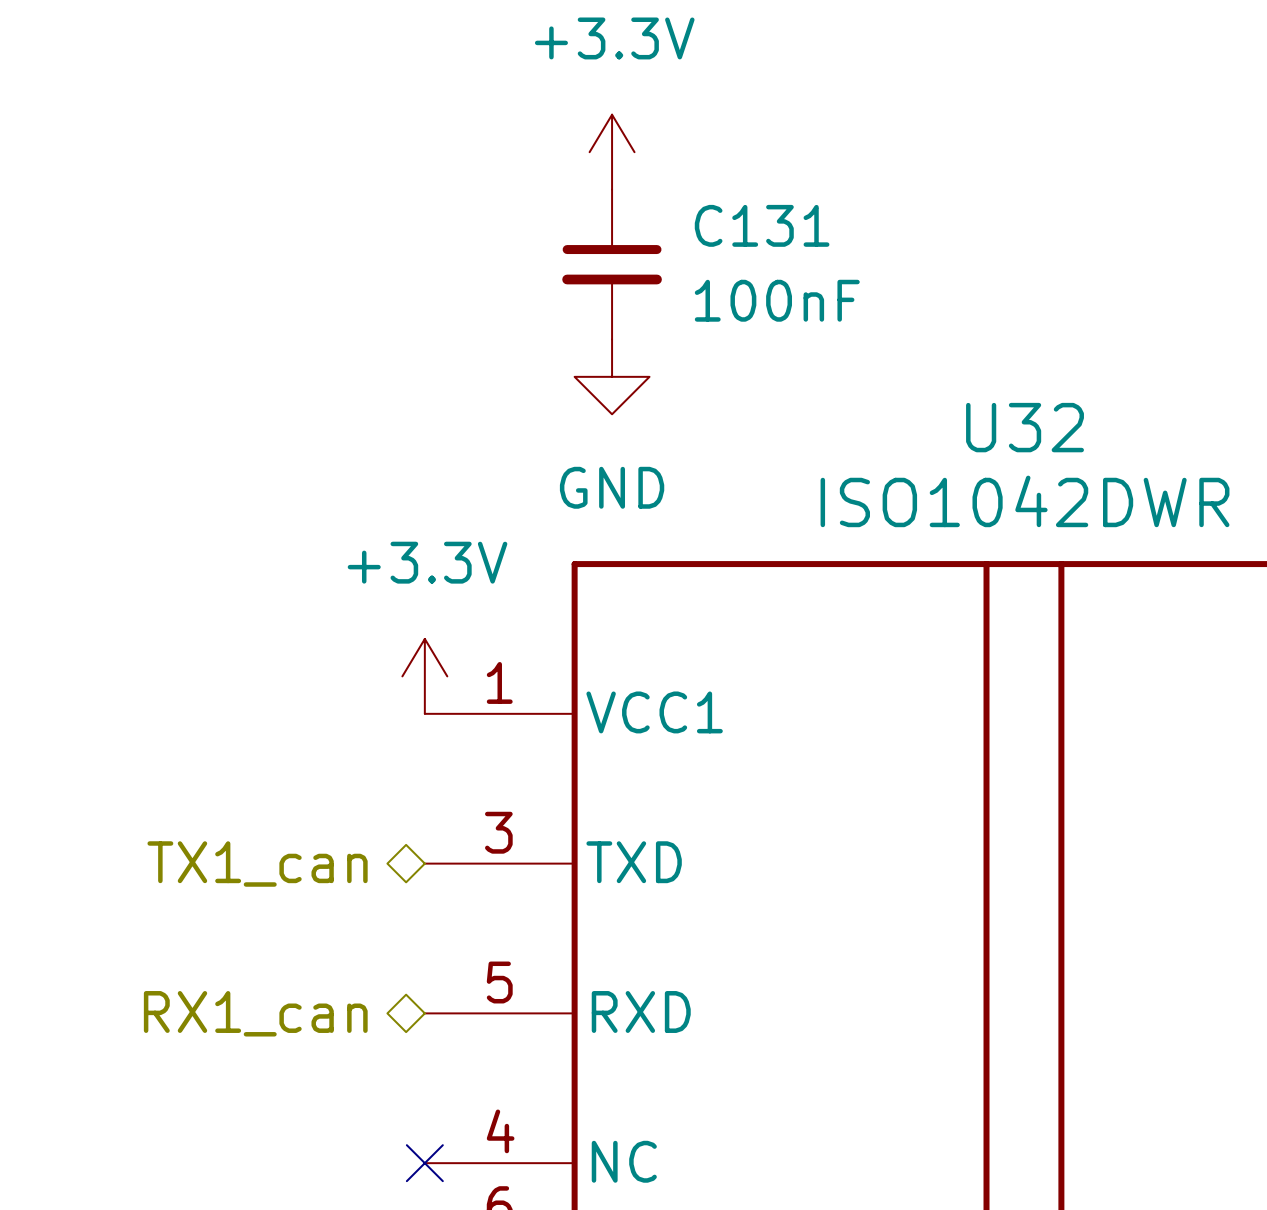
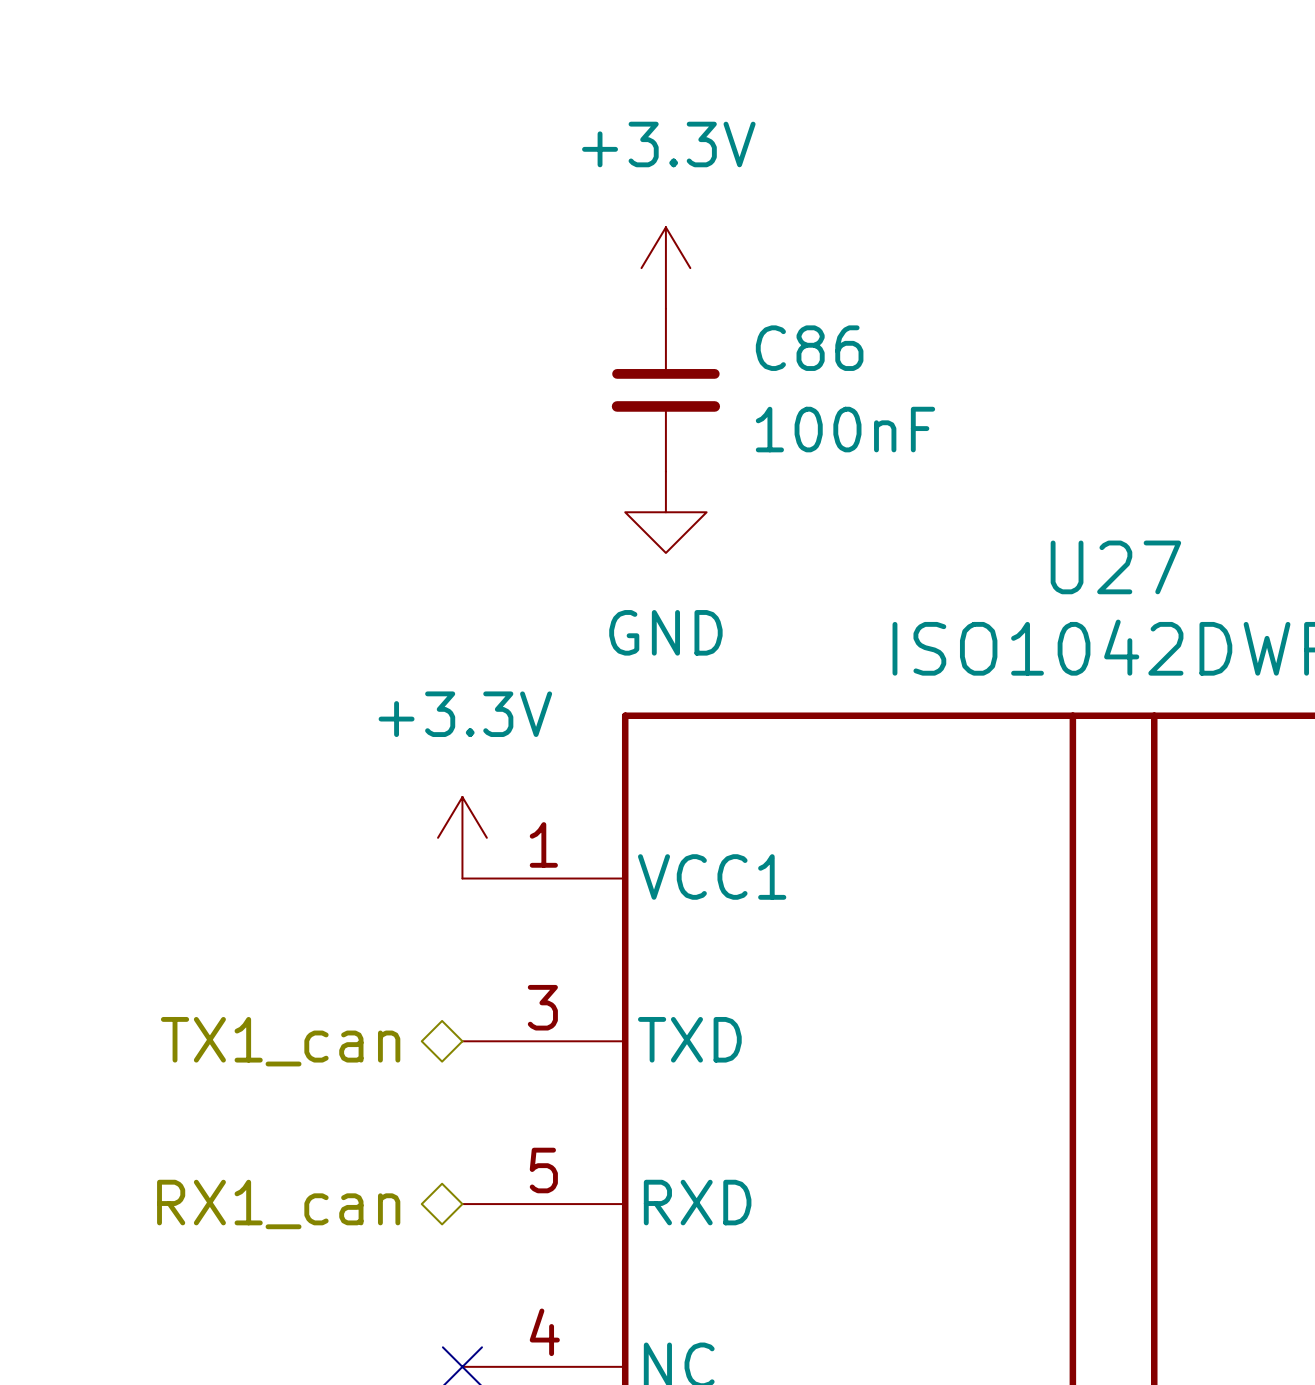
C131 name: C131 (762, 225) -> C86 (809, 348)
U32 name: U32 (1025, 427) -> U27 (1115, 567)

